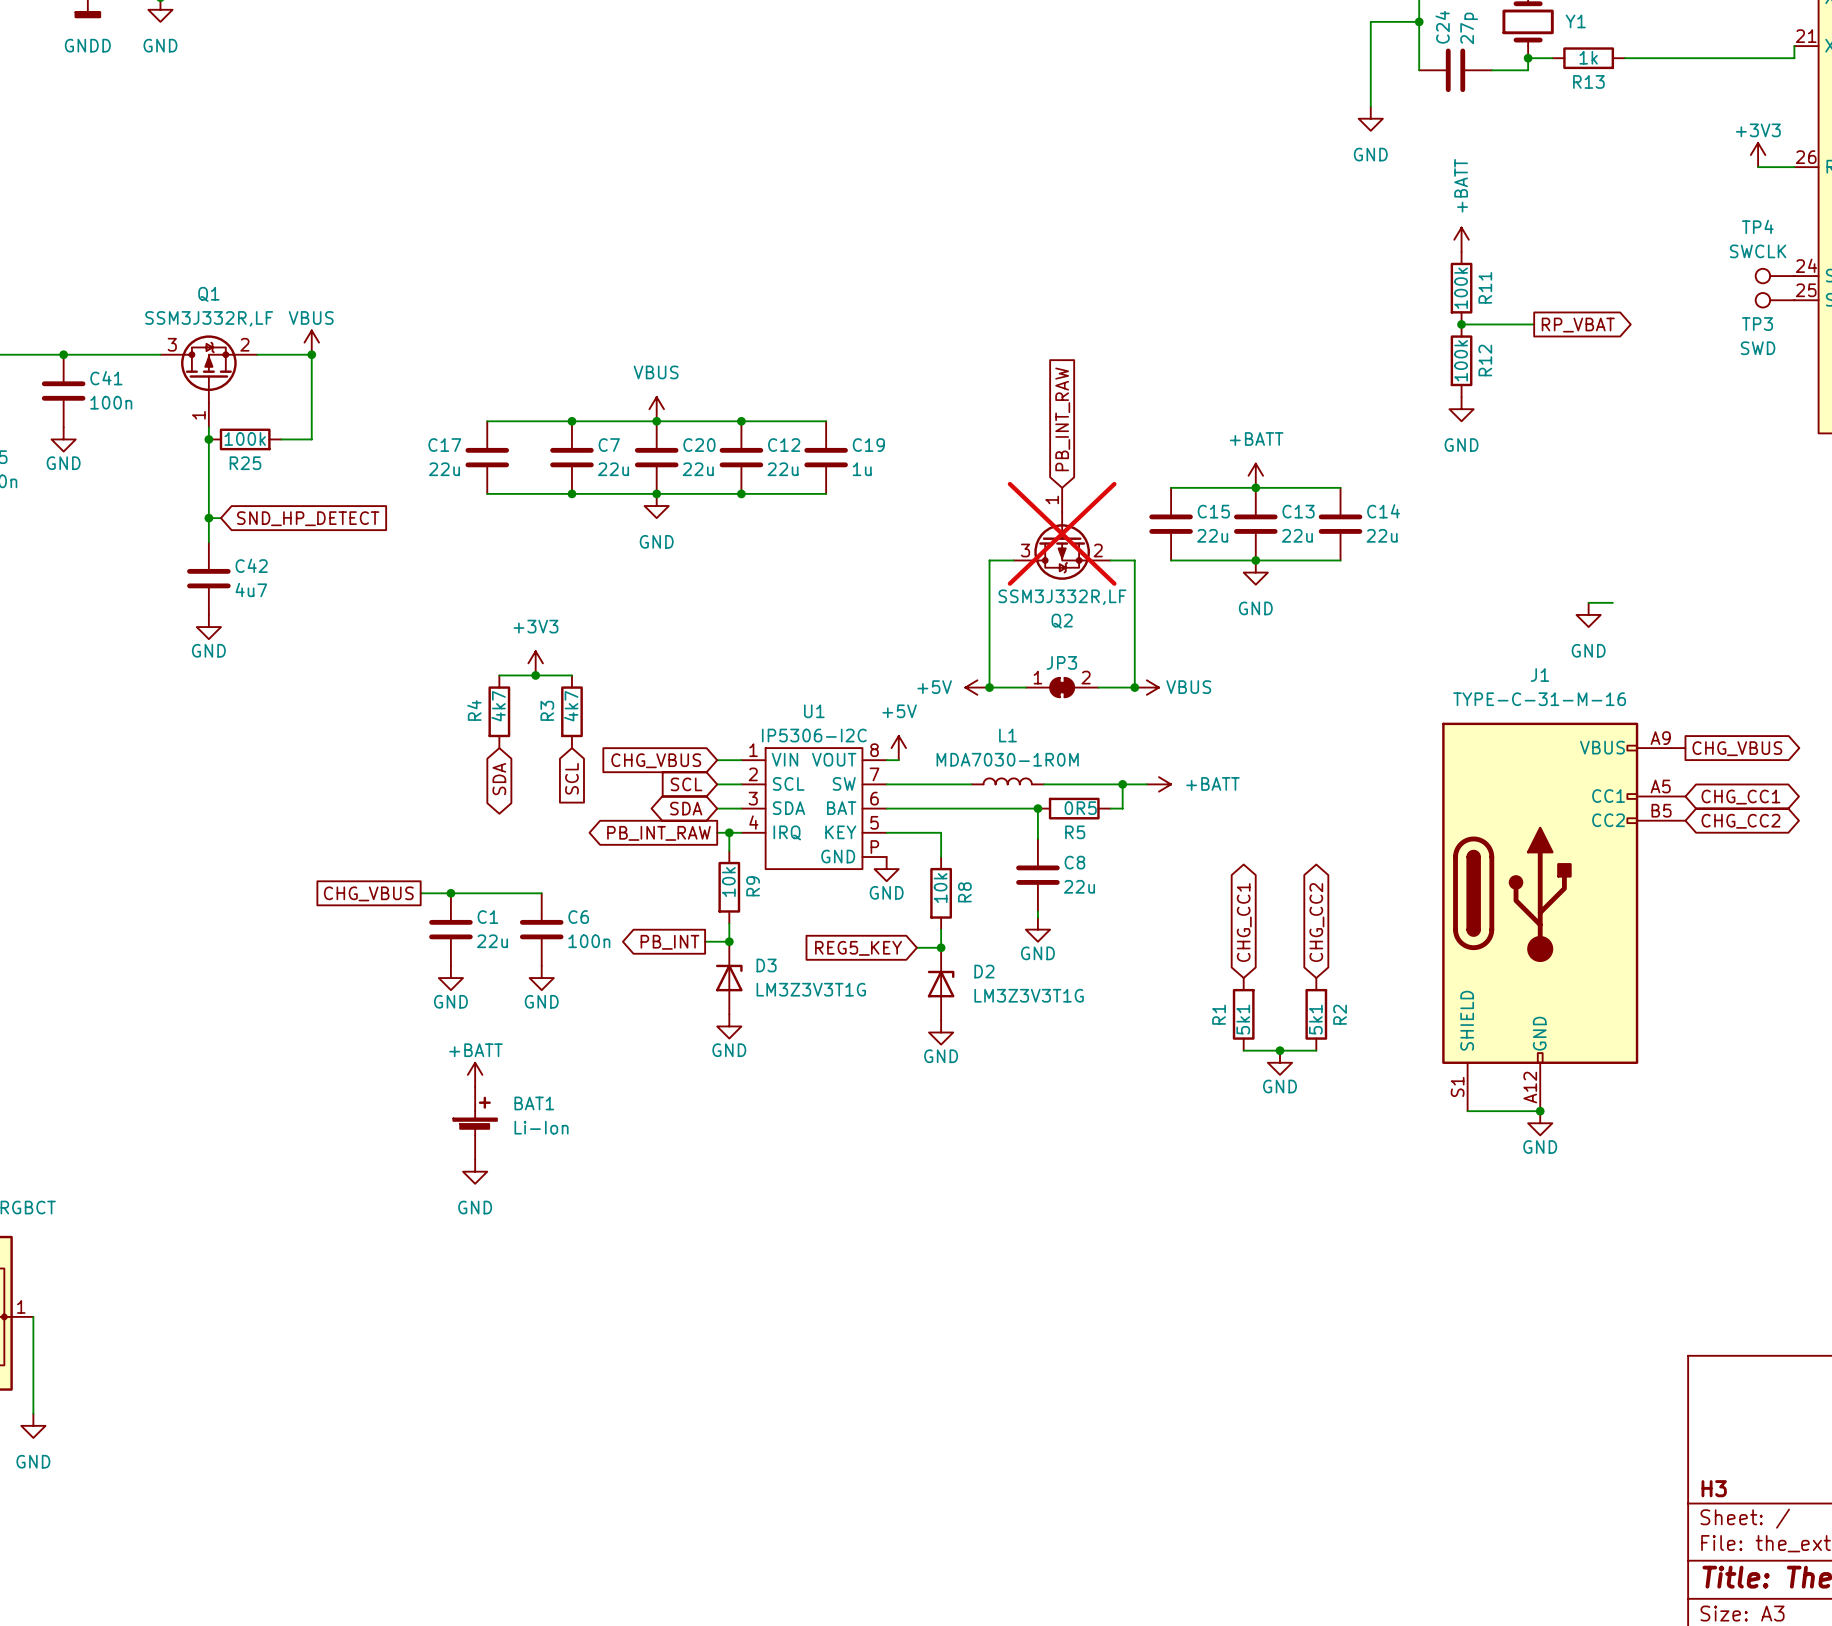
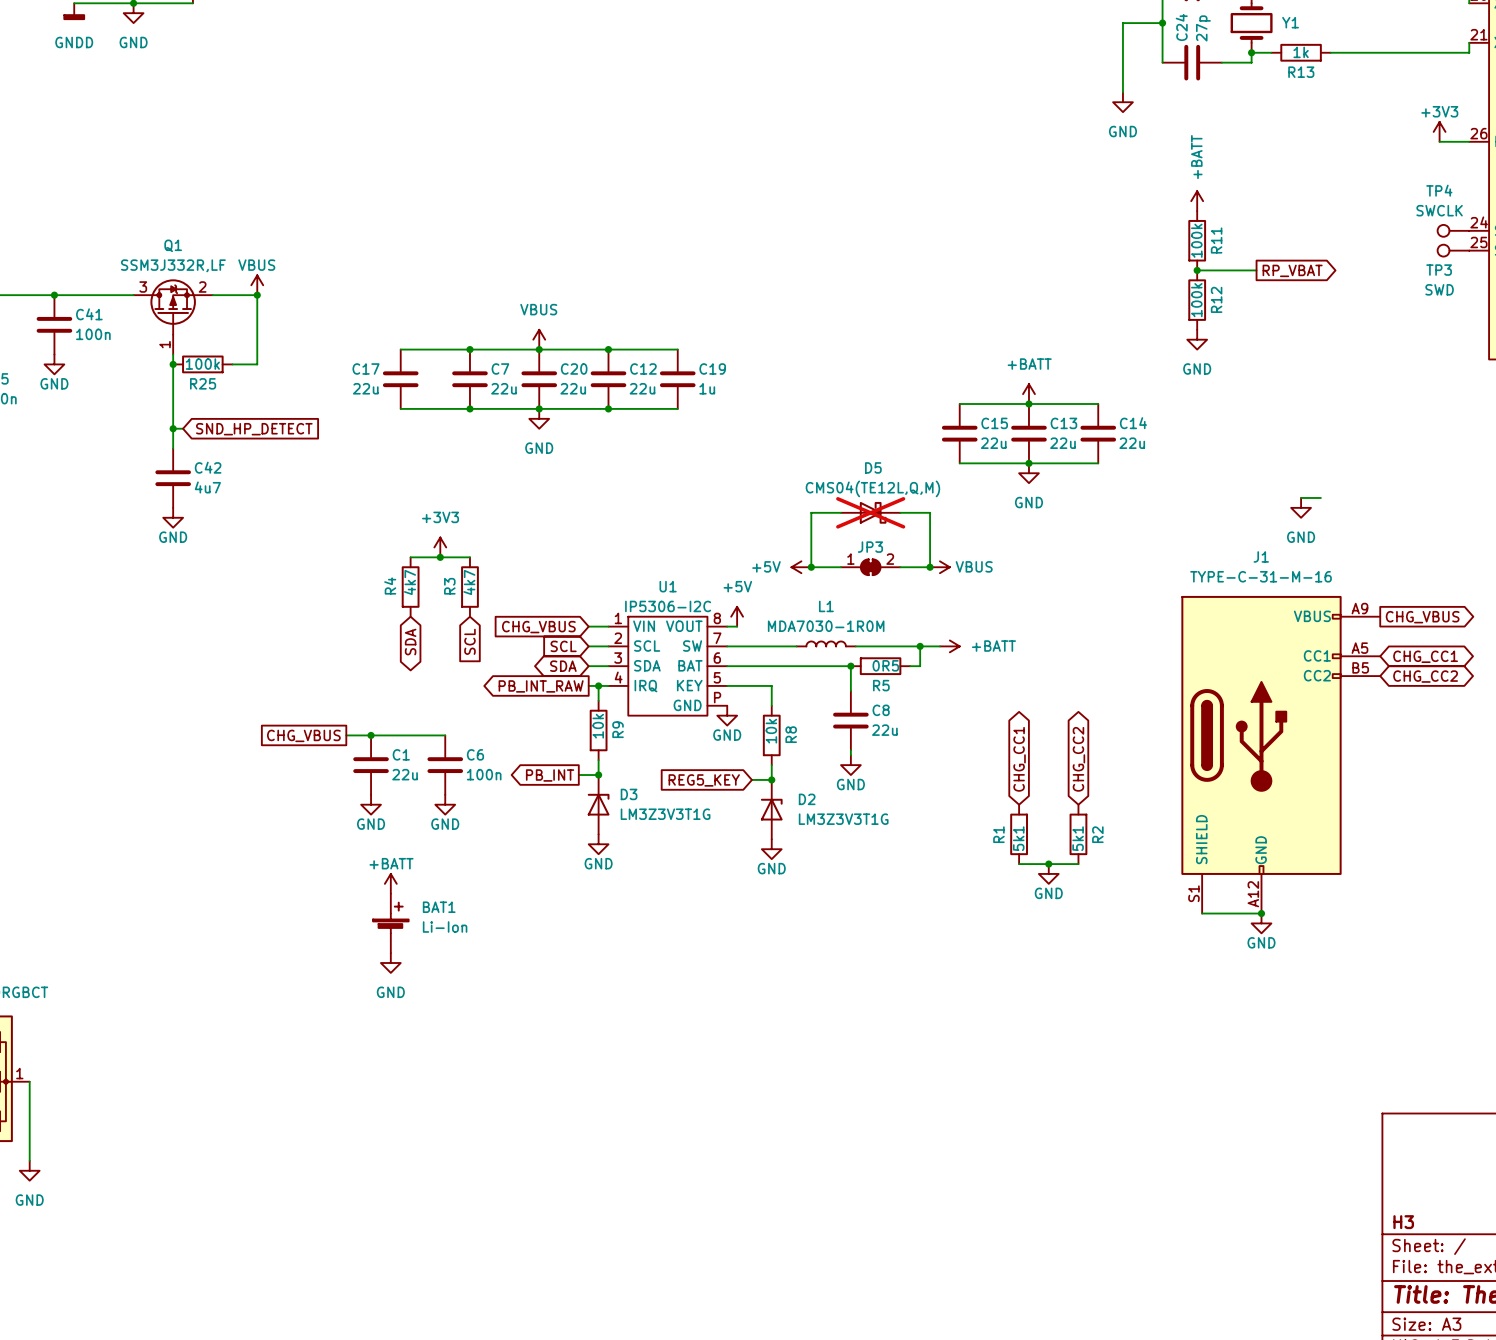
global label: PB_INT_RAW (1062, 419) -> none
Q2: SSM3J332R,LF (1062, 533) -> none
wire: (1013, 560) (989, 560) (989, 621) -> (841, 512) (811, 512)
wire: (1110, 560) (1134, 560) (1134, 621) -> (900, 512) (930, 512)
D5: none -> CMS04(TE12L,Q,M) (870, 512)

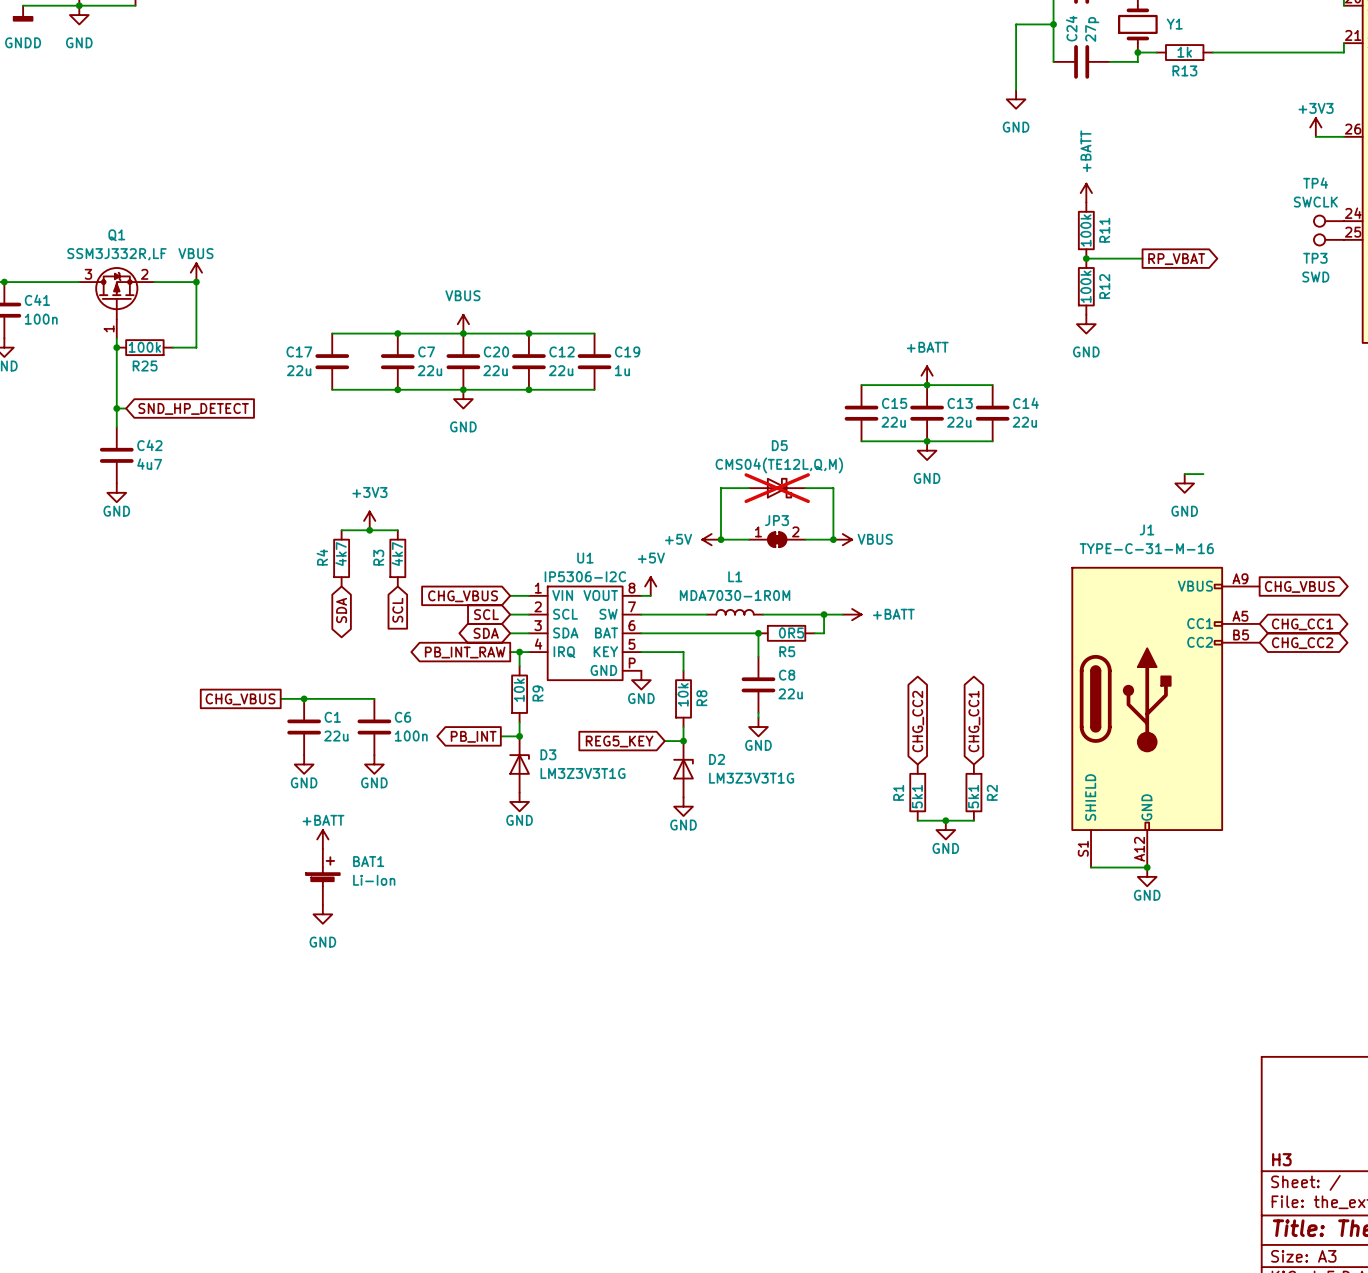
global label: CHG_CC1 (1019, 759) -> CHG_CC2 (918, 721)
global label: CHG_CC2 (1078, 759) -> CHG_CC1 (974, 721)

